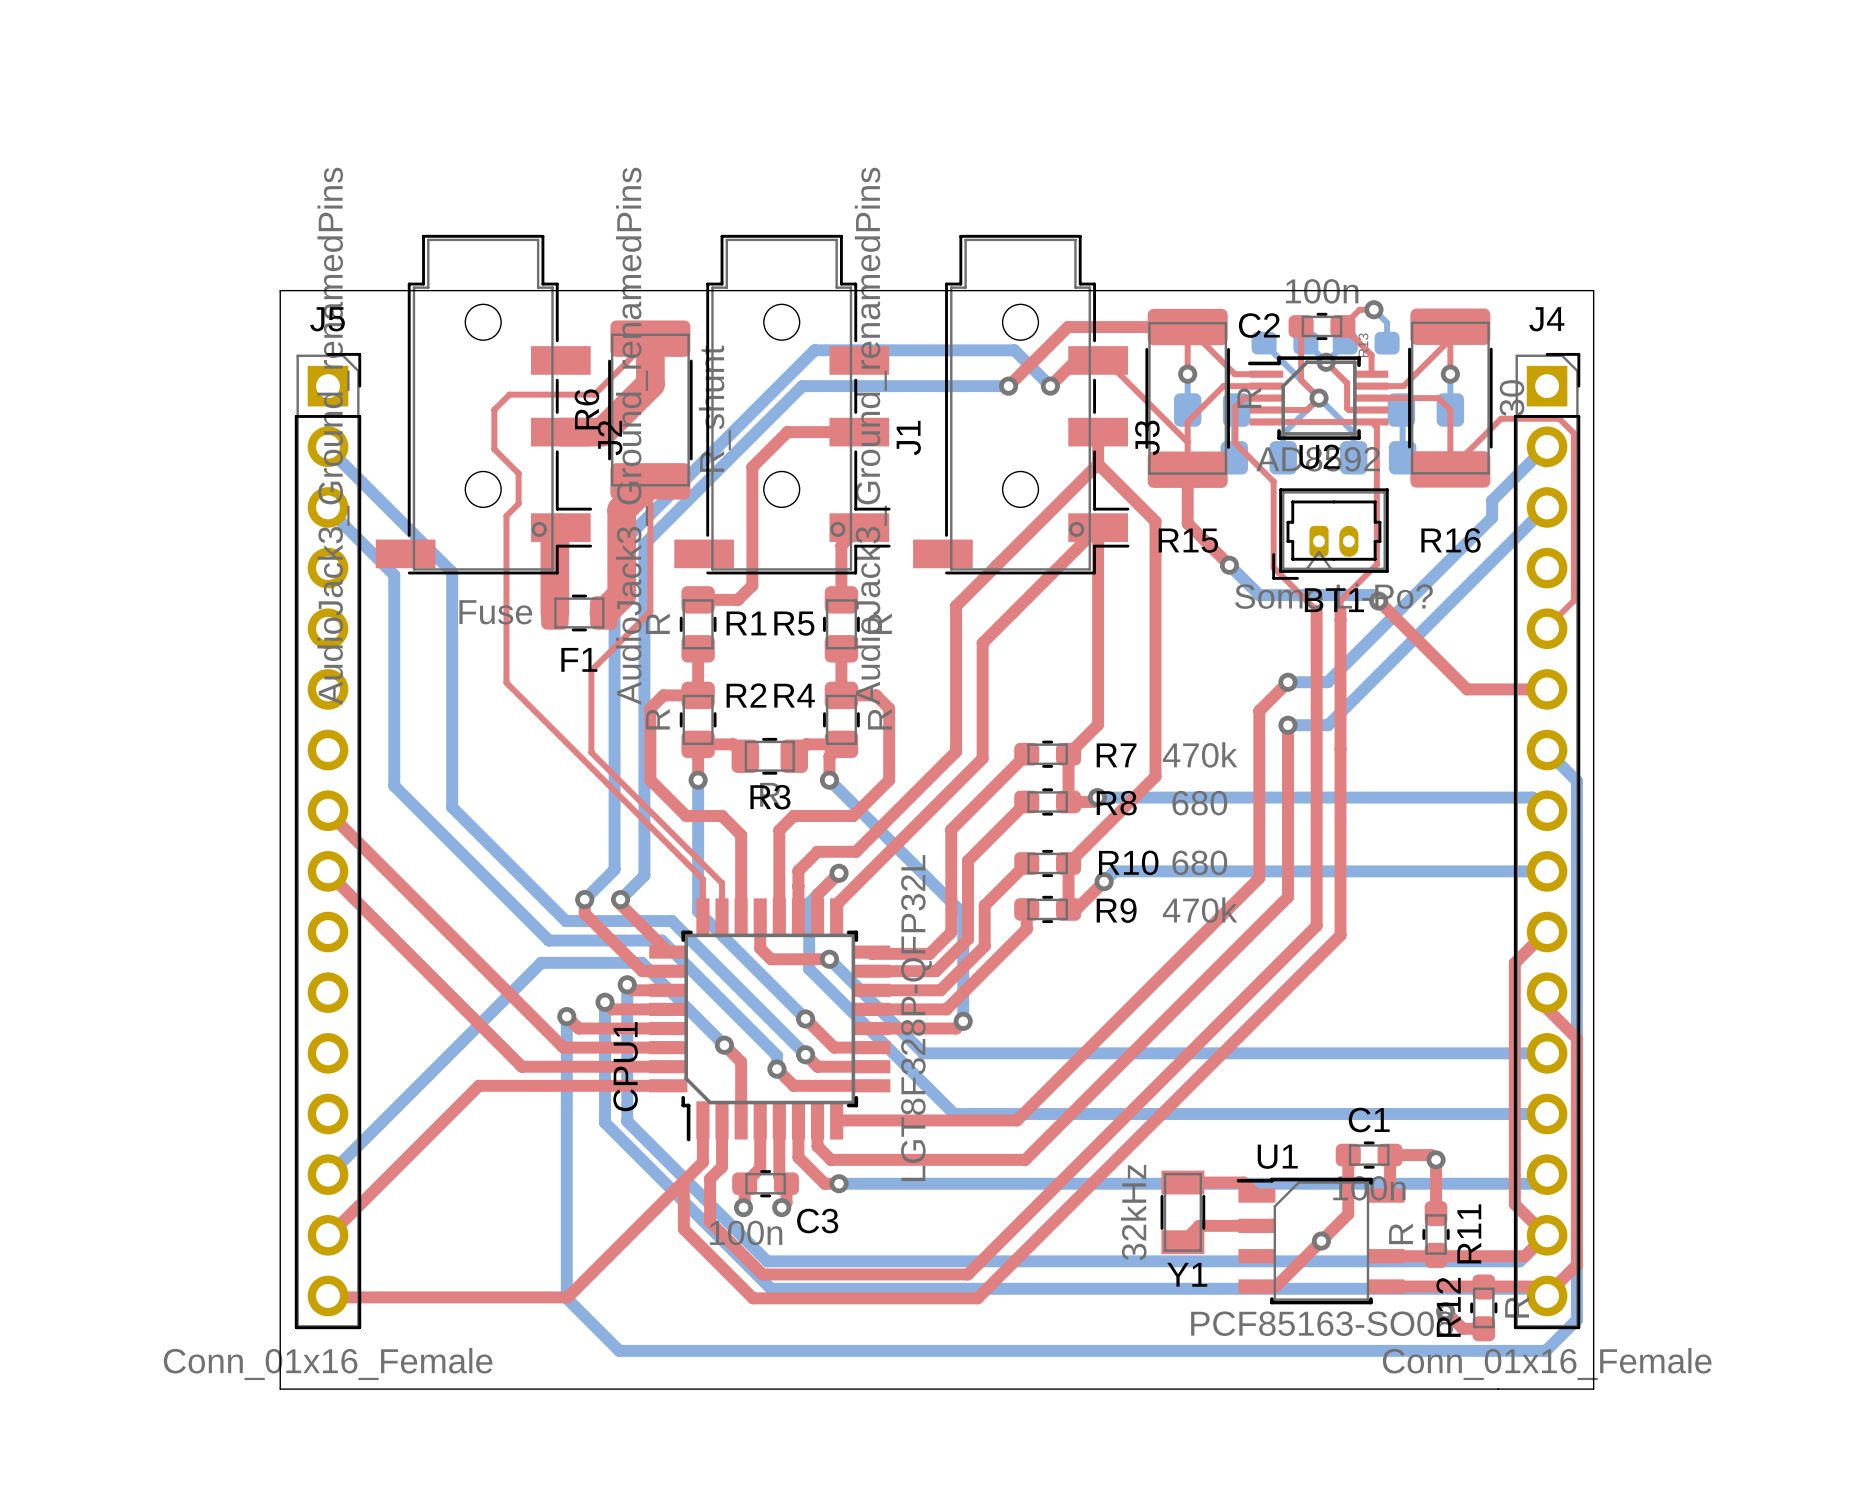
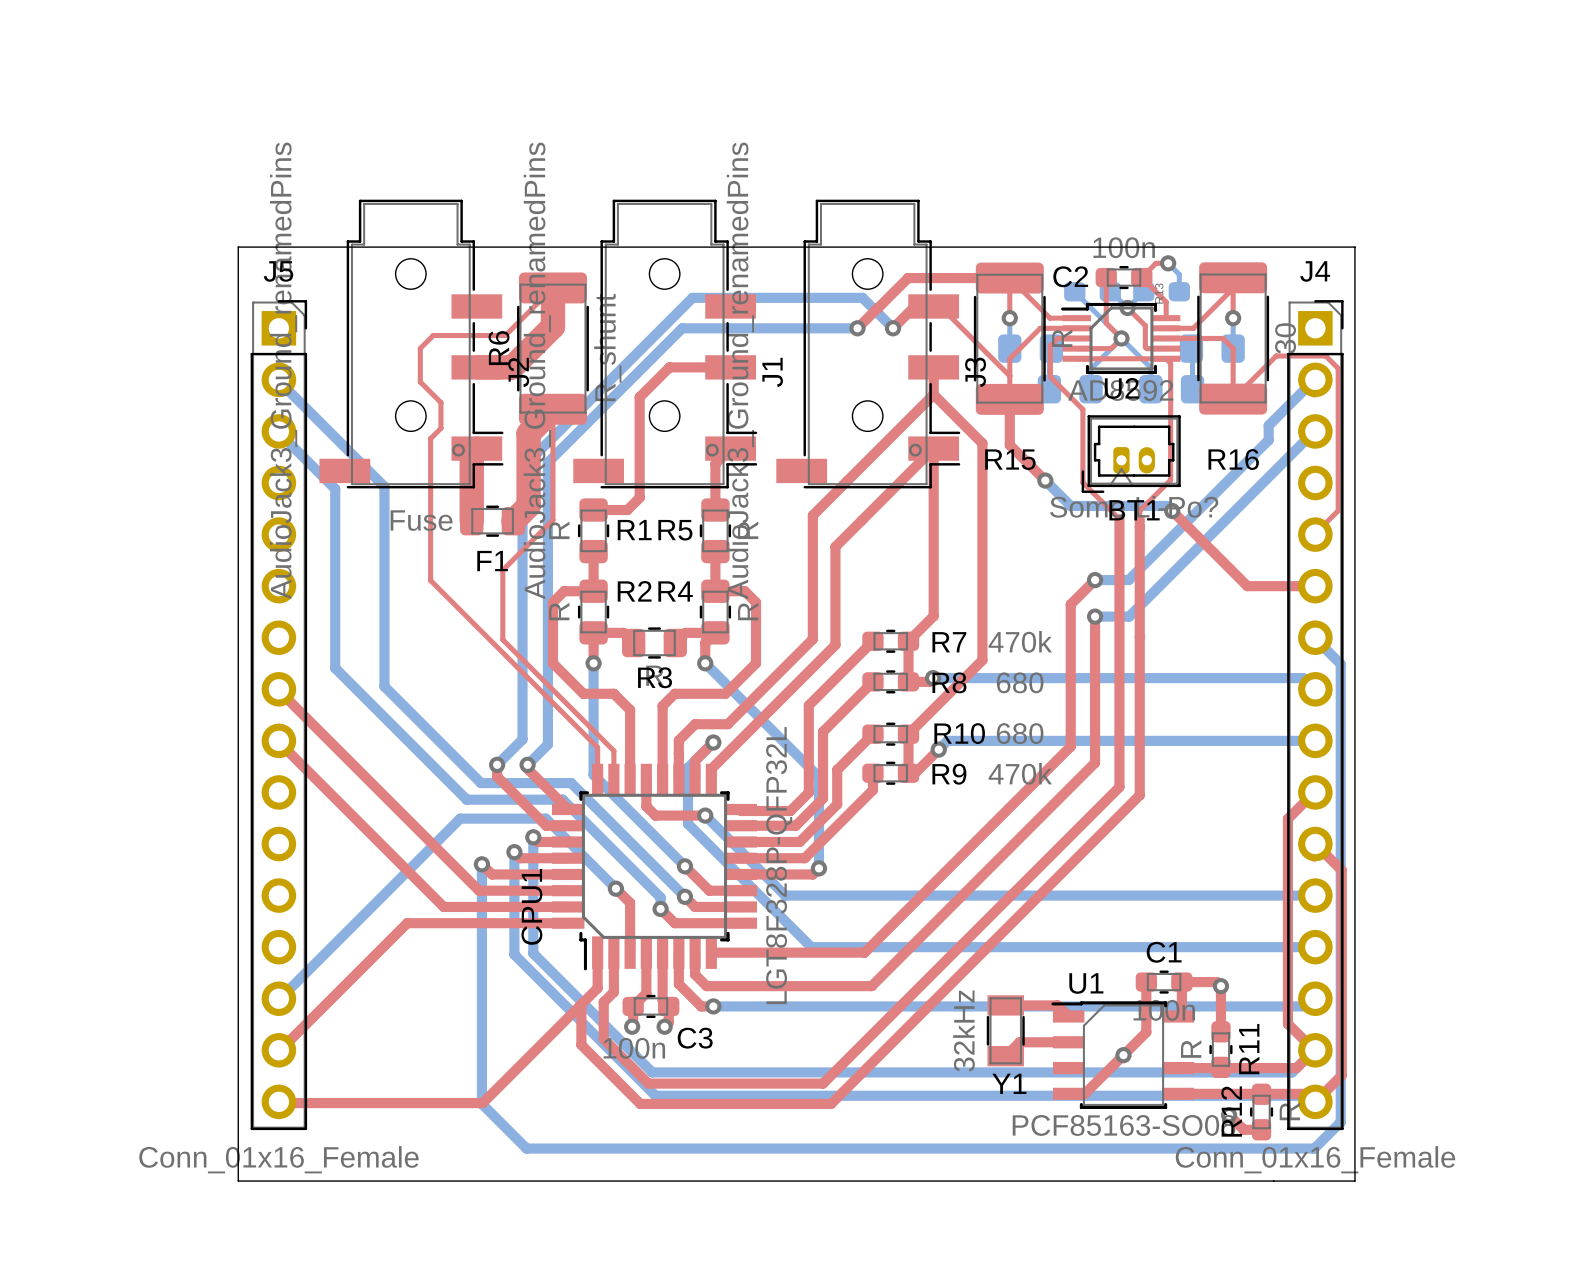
top track: none -> (1315, 844) (1341, 870) (1341, 1075) (1315, 1101)
top track: (1545, 1007) (1576, 1038) (1576, 1264) (1545, 1295) -> none

